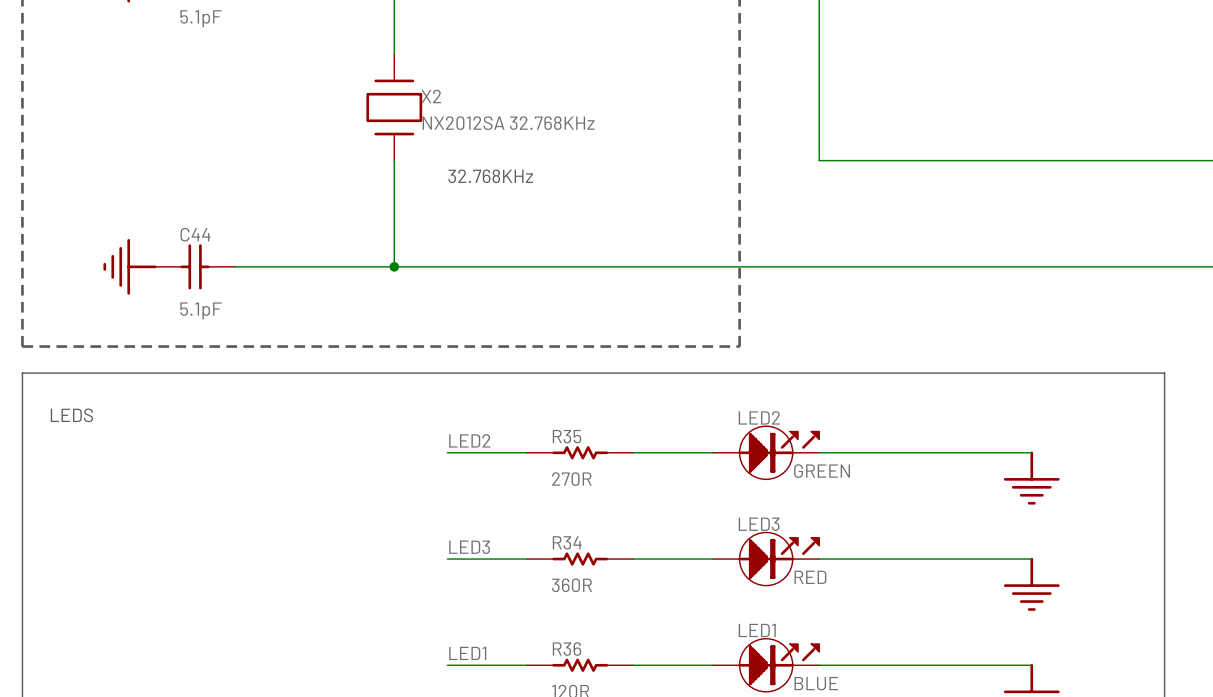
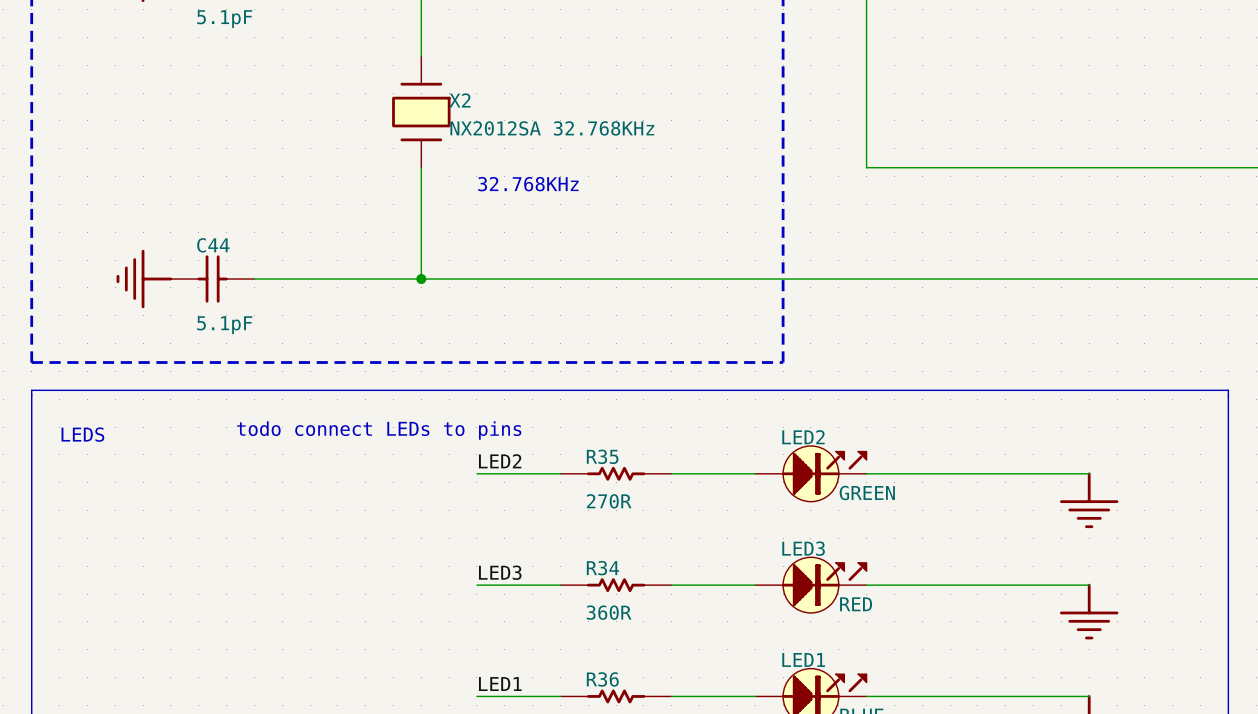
text: none -> todo connect LEDs to pins (379, 430)

